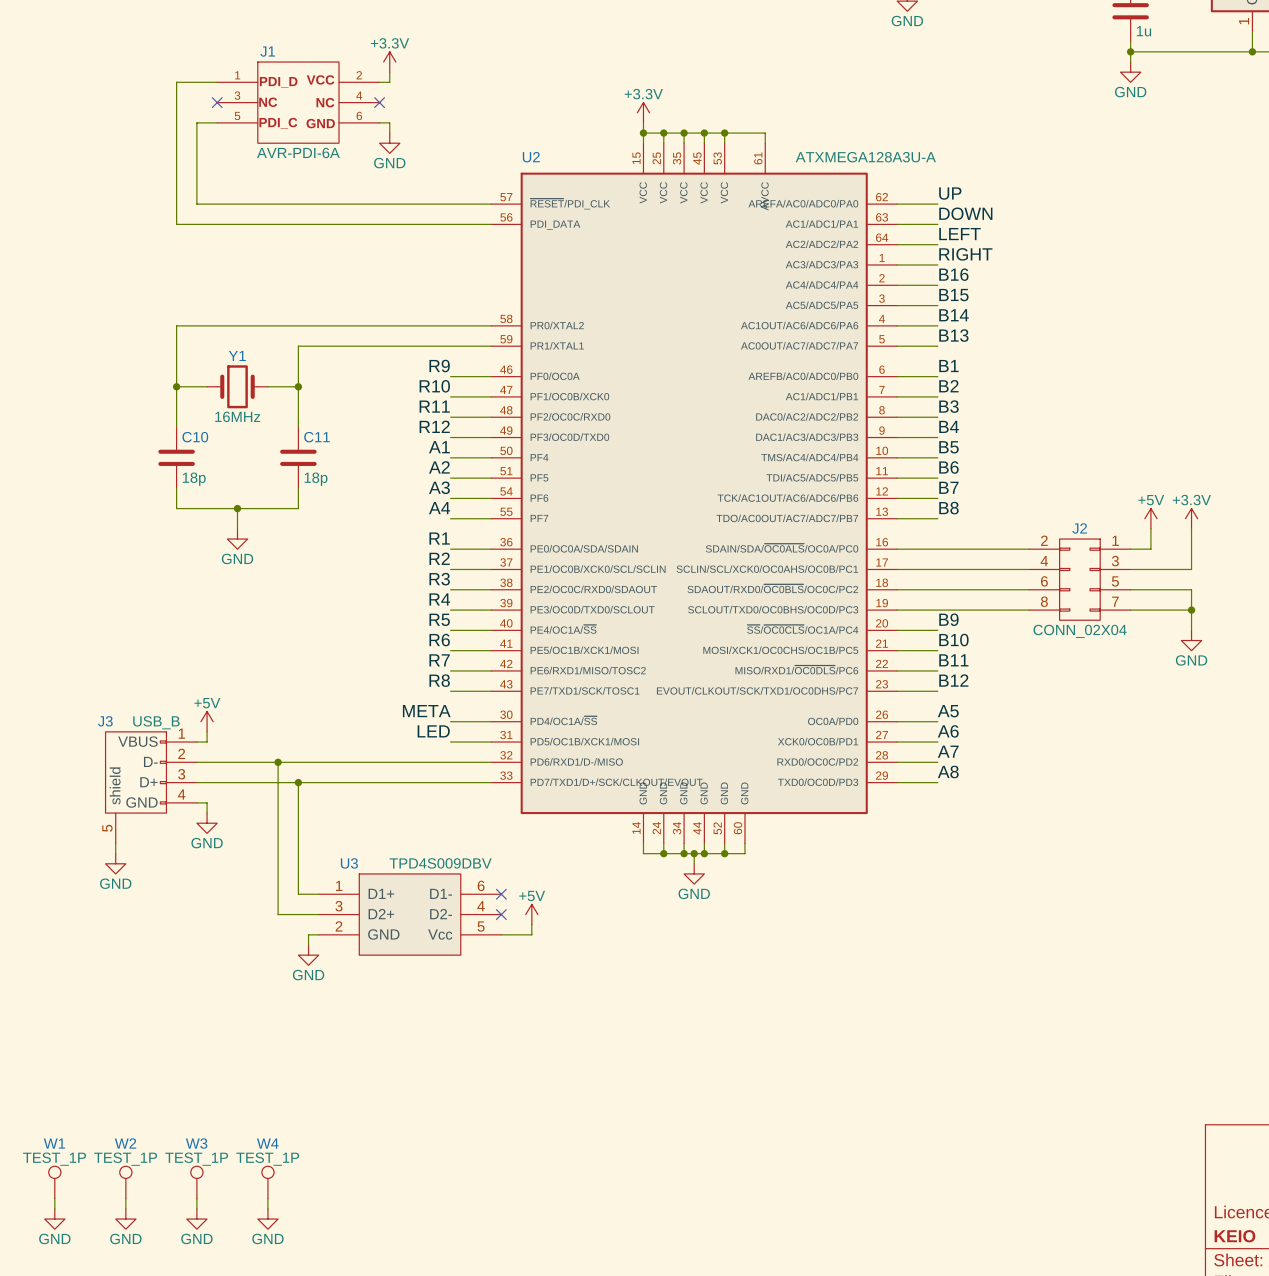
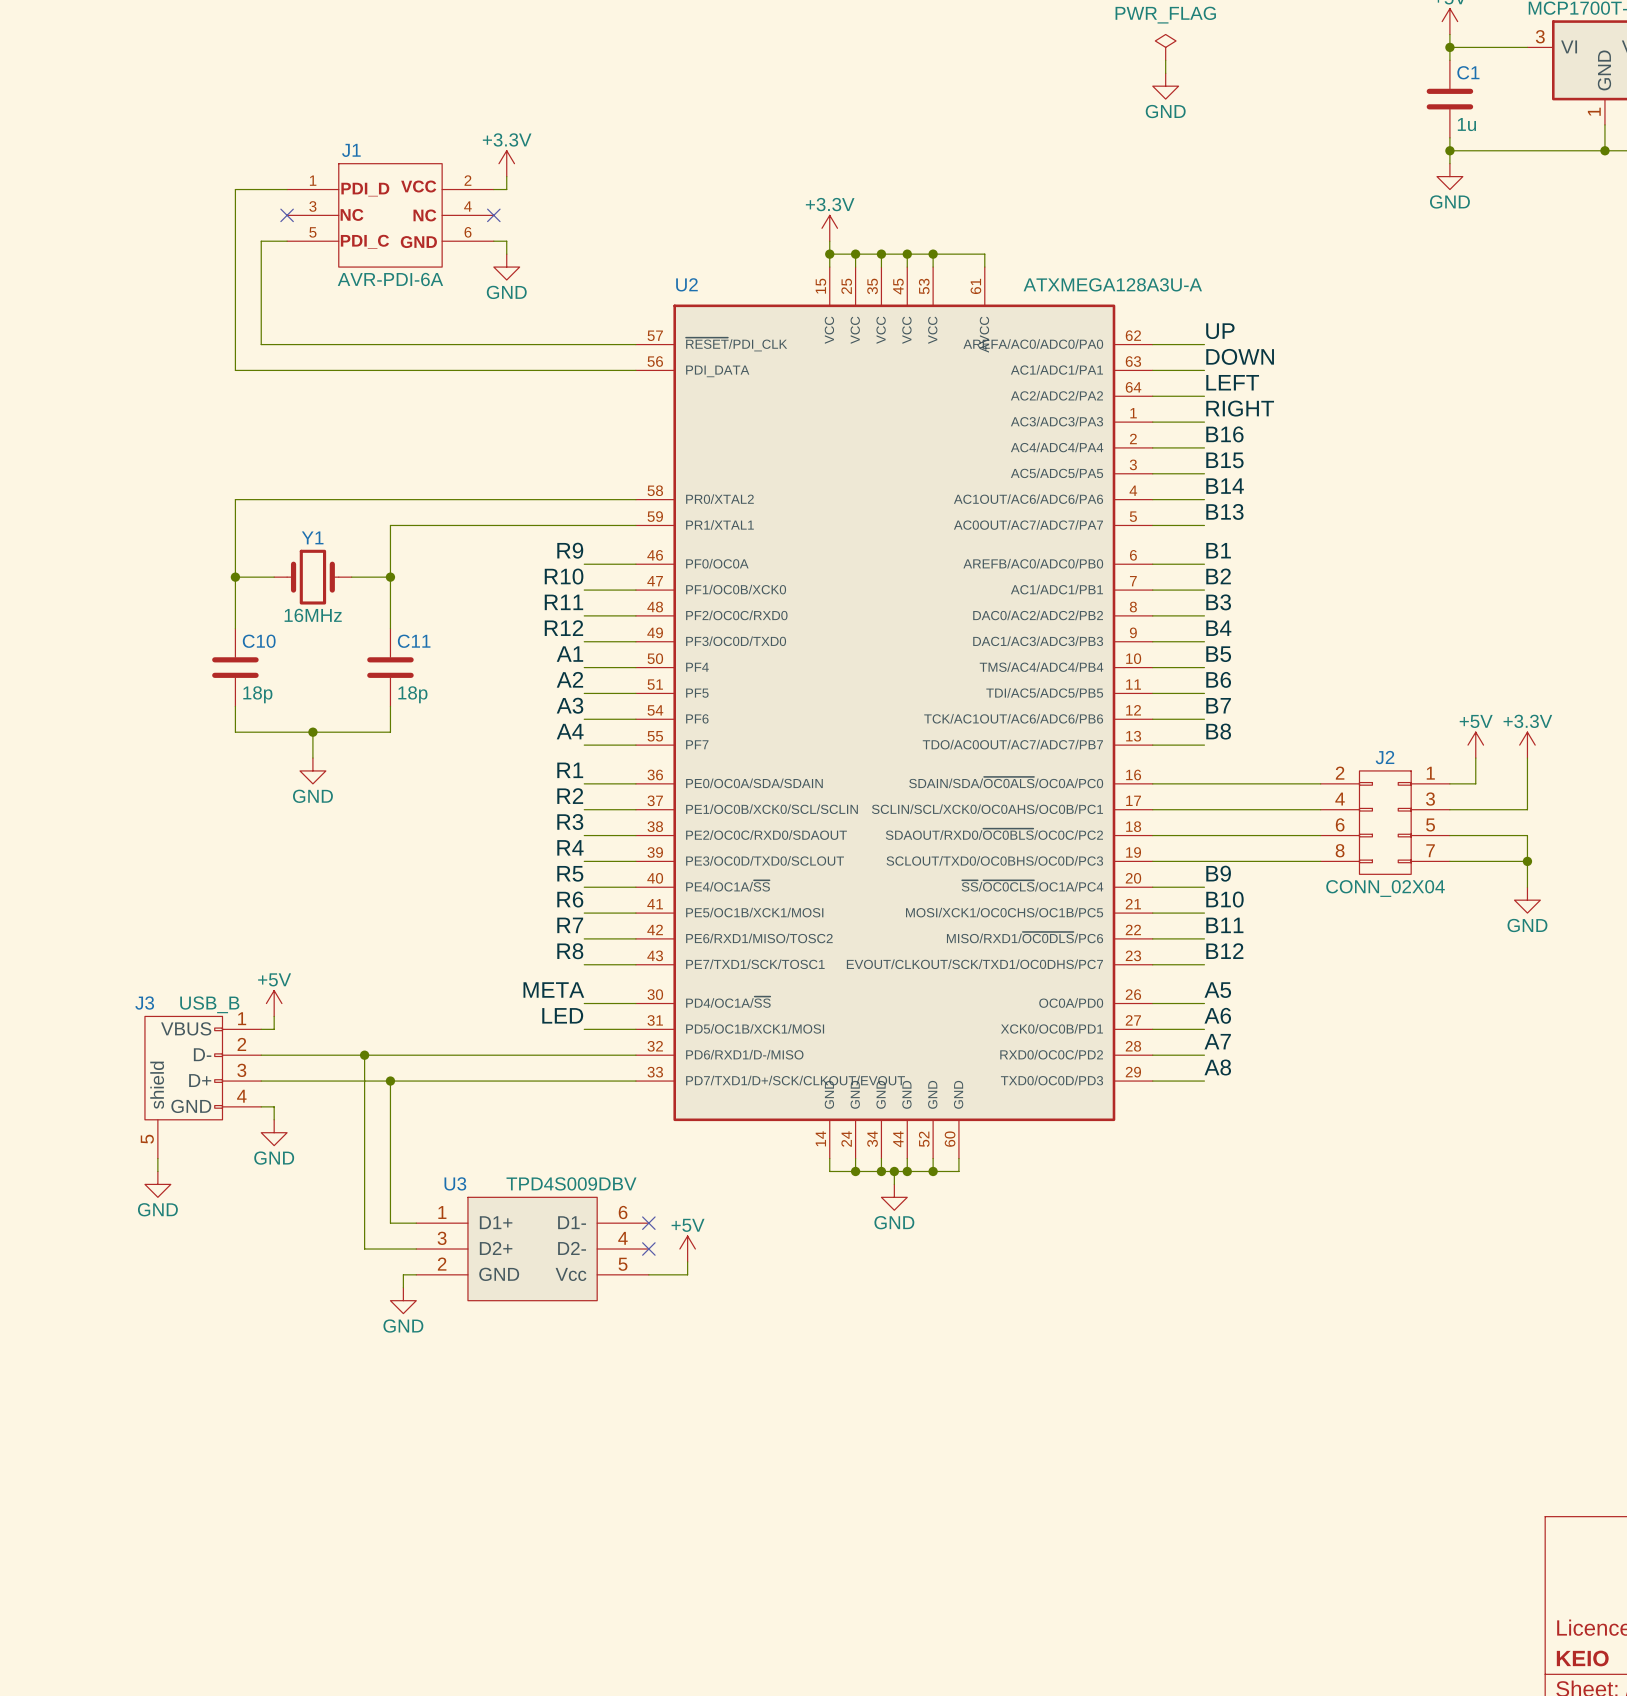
W1: TEST_1P (54, 1182) -> none
W2: TEST_1P (125, 1182) -> none
W3: TEST_1P (196, 1182) -> none
W4: TEST_1P (267, 1182) -> none
wire: (54, 1198) (54, 1208) -> none
wire: (125, 1198) (125, 1208) -> none
wire: (196, 1198) (196, 1208) -> none
wire: (267, 1198) (267, 1208) -> none
power symbol: GND (54, 1219) -> none
power symbol: GND (125, 1219) -> none
power symbol: GND (196, 1219) -> none
power symbol: GND (267, 1219) -> none

